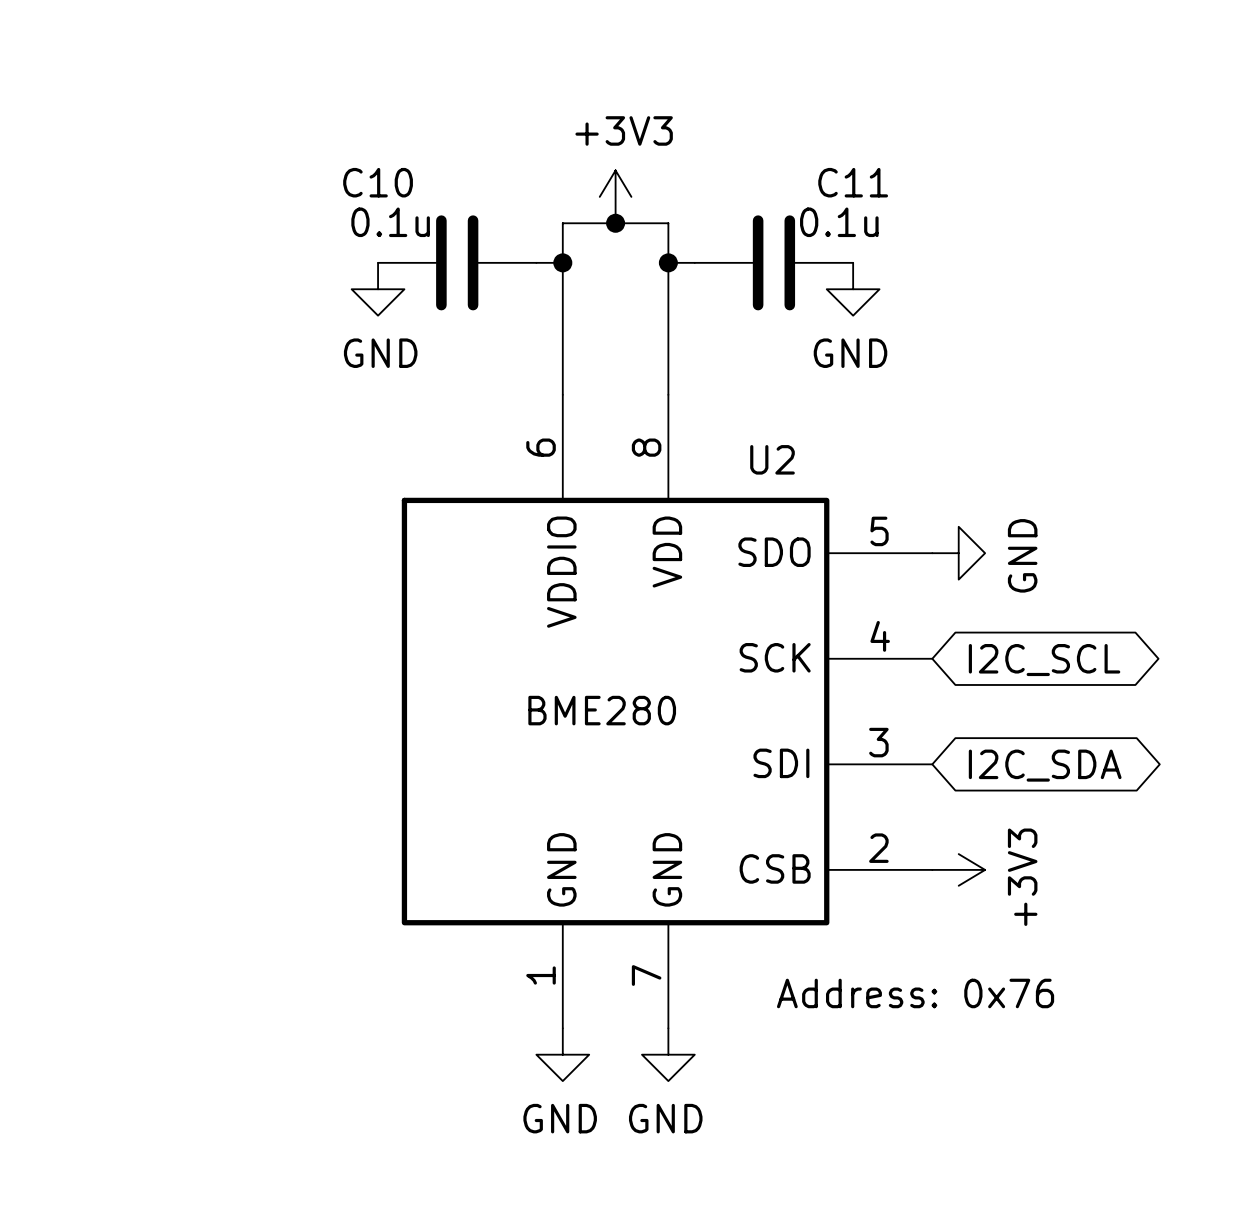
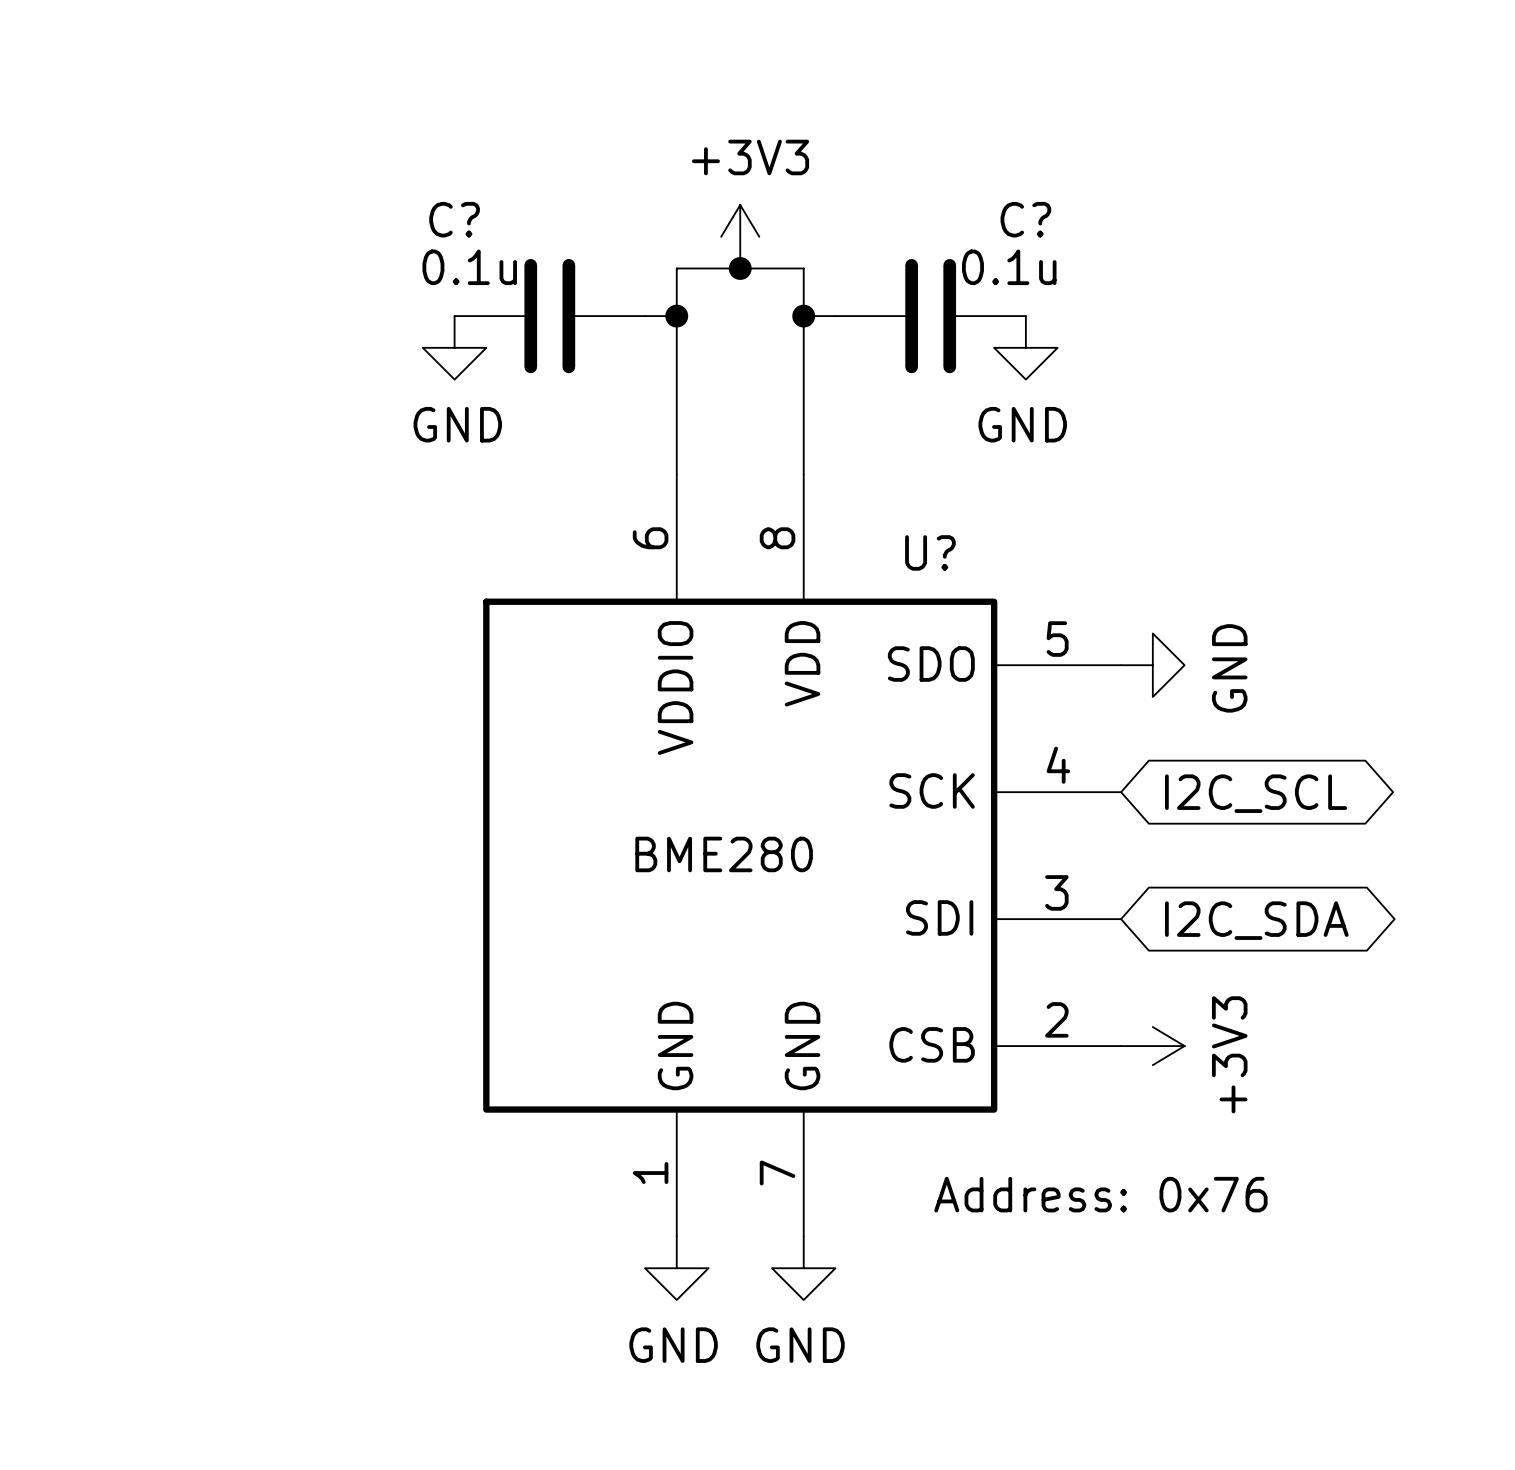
C10 name: C10 (378, 182) -> C? (454, 219)
C11 name: C11 (853, 182) -> C? (1025, 219)
U2 name: U2 (772, 459) -> U? (930, 552)

